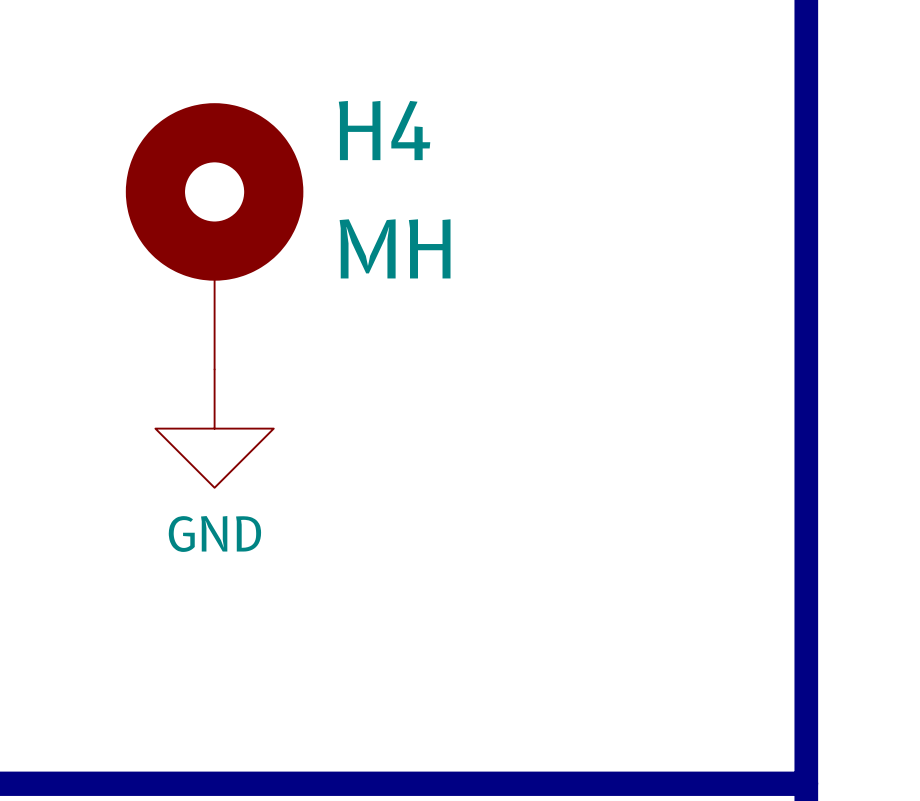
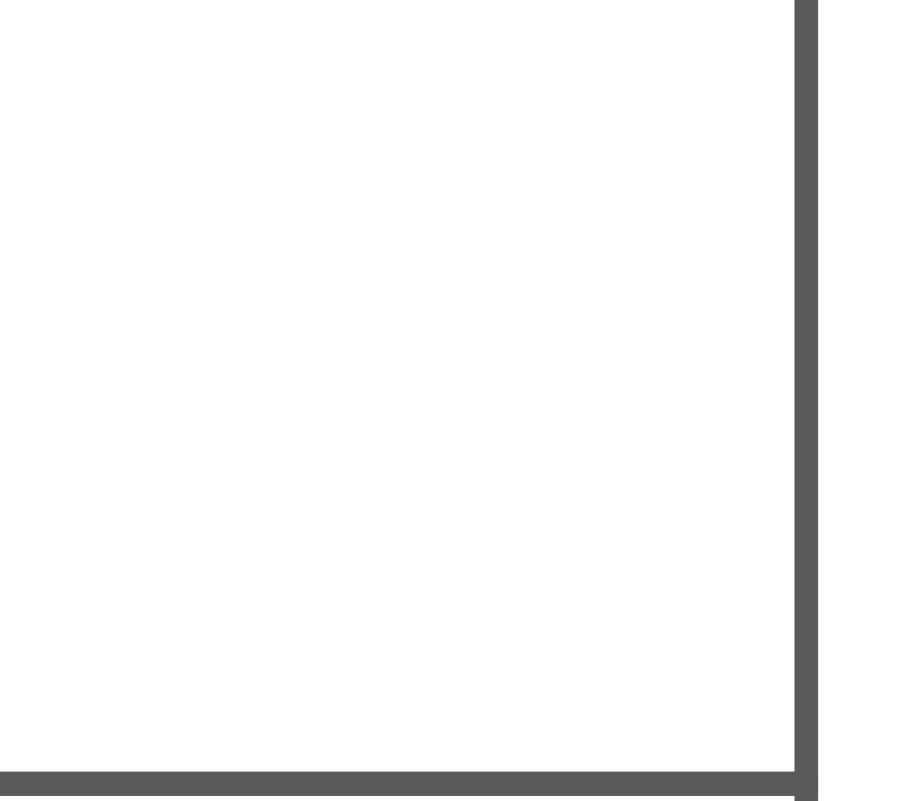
H4: MH (214, 236) -> none
power symbol: GND (214, 428) -> none

